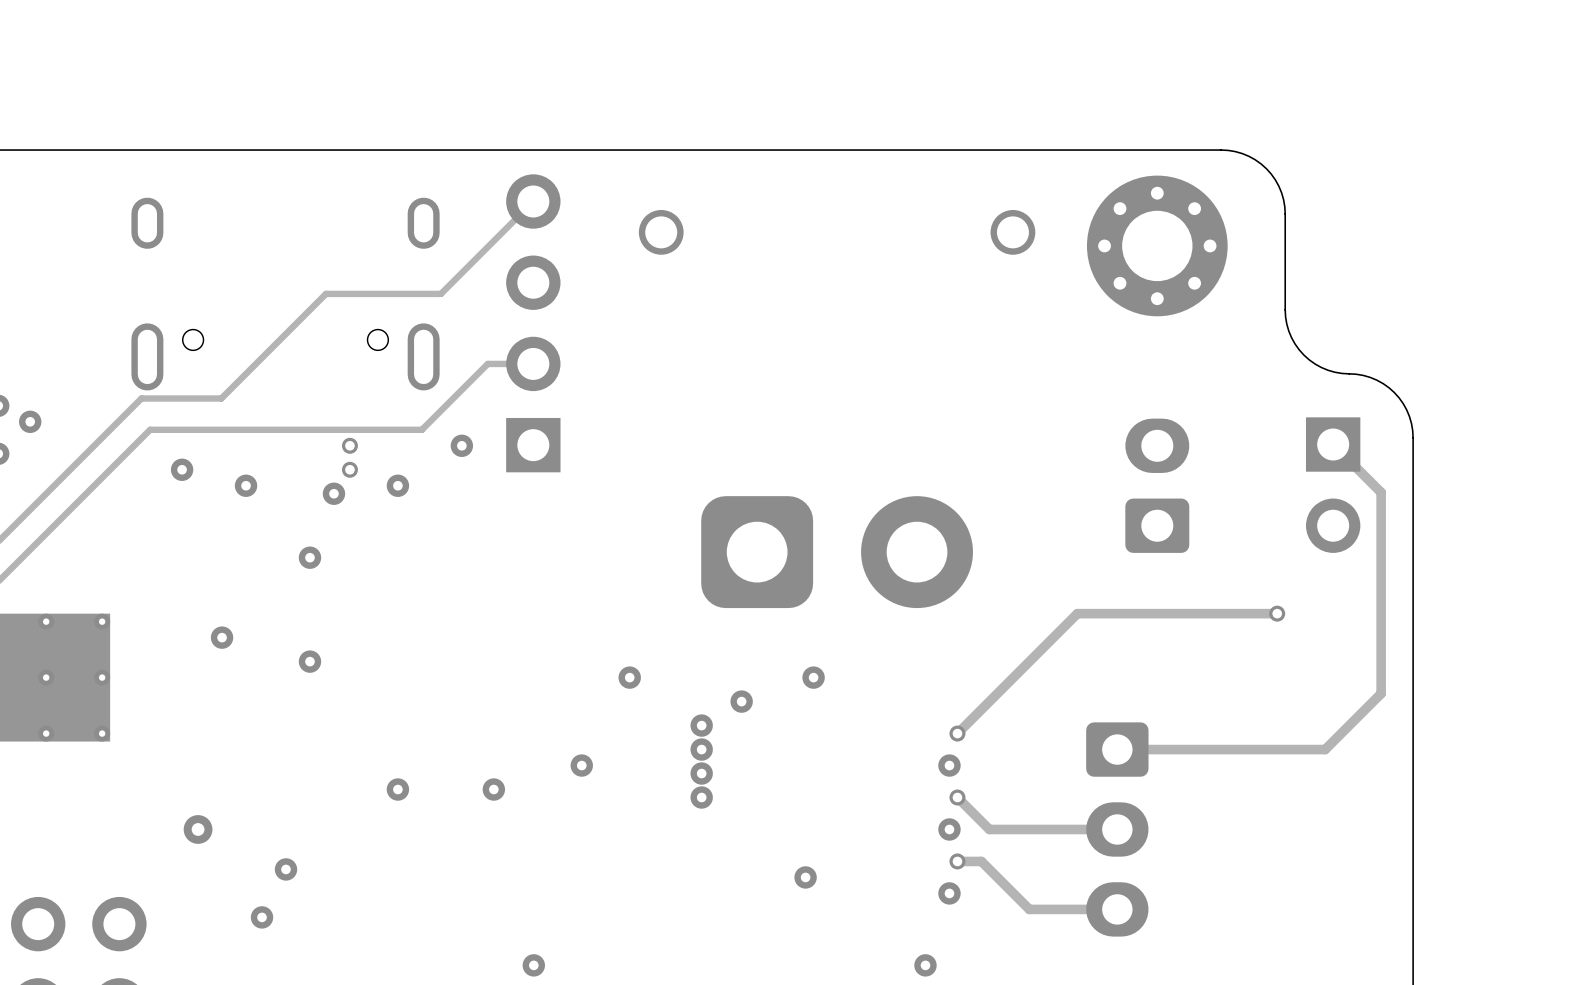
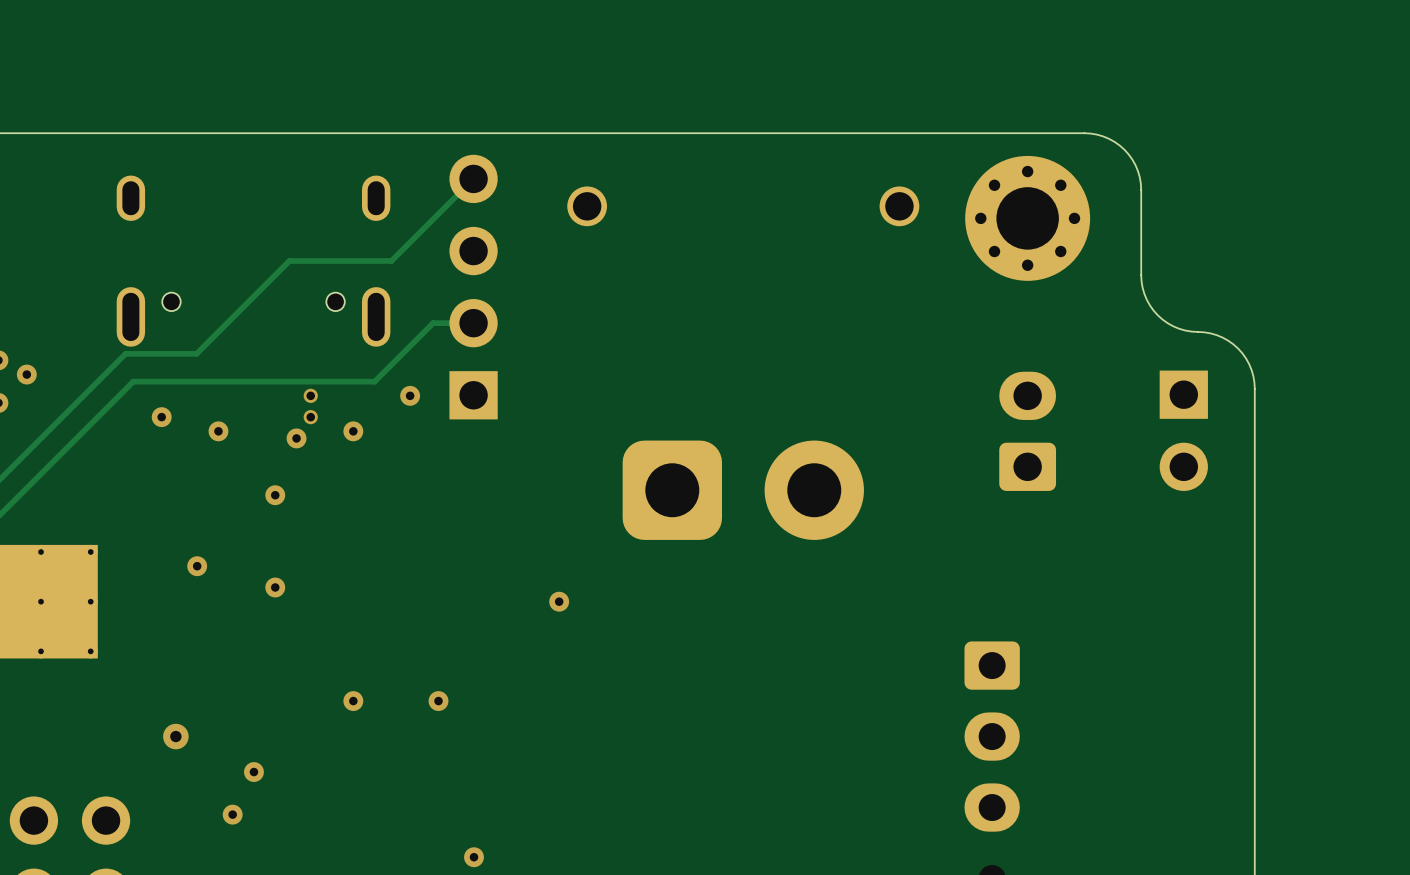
track: (1333, 444) (1381, 492) (1381, 693) (1325, 749) (1117, 749) -> none
track: (1277, 613) (1077, 613) (957, 733) -> none
via: (1277, 613) -> none
via: (813, 677) -> none
via: (741, 701) -> none
via: (701, 725) -> none
via: (957, 733) -> none
via: (701, 749) -> none
via: (581, 765) -> none
via: (949, 765) -> none
via: (701, 773) -> none
via: (701, 797) -> none
track: (957, 797) (989, 829) (1117, 829) -> none
via: (957, 797) -> none
via: (949, 829) -> none
track: (957, 861) (981, 861) (1029, 909) (1117, 909) -> none
via: (957, 861) -> none
via: (805, 877) -> none
via: (949, 893) -> none
via: (925, 965) -> none

